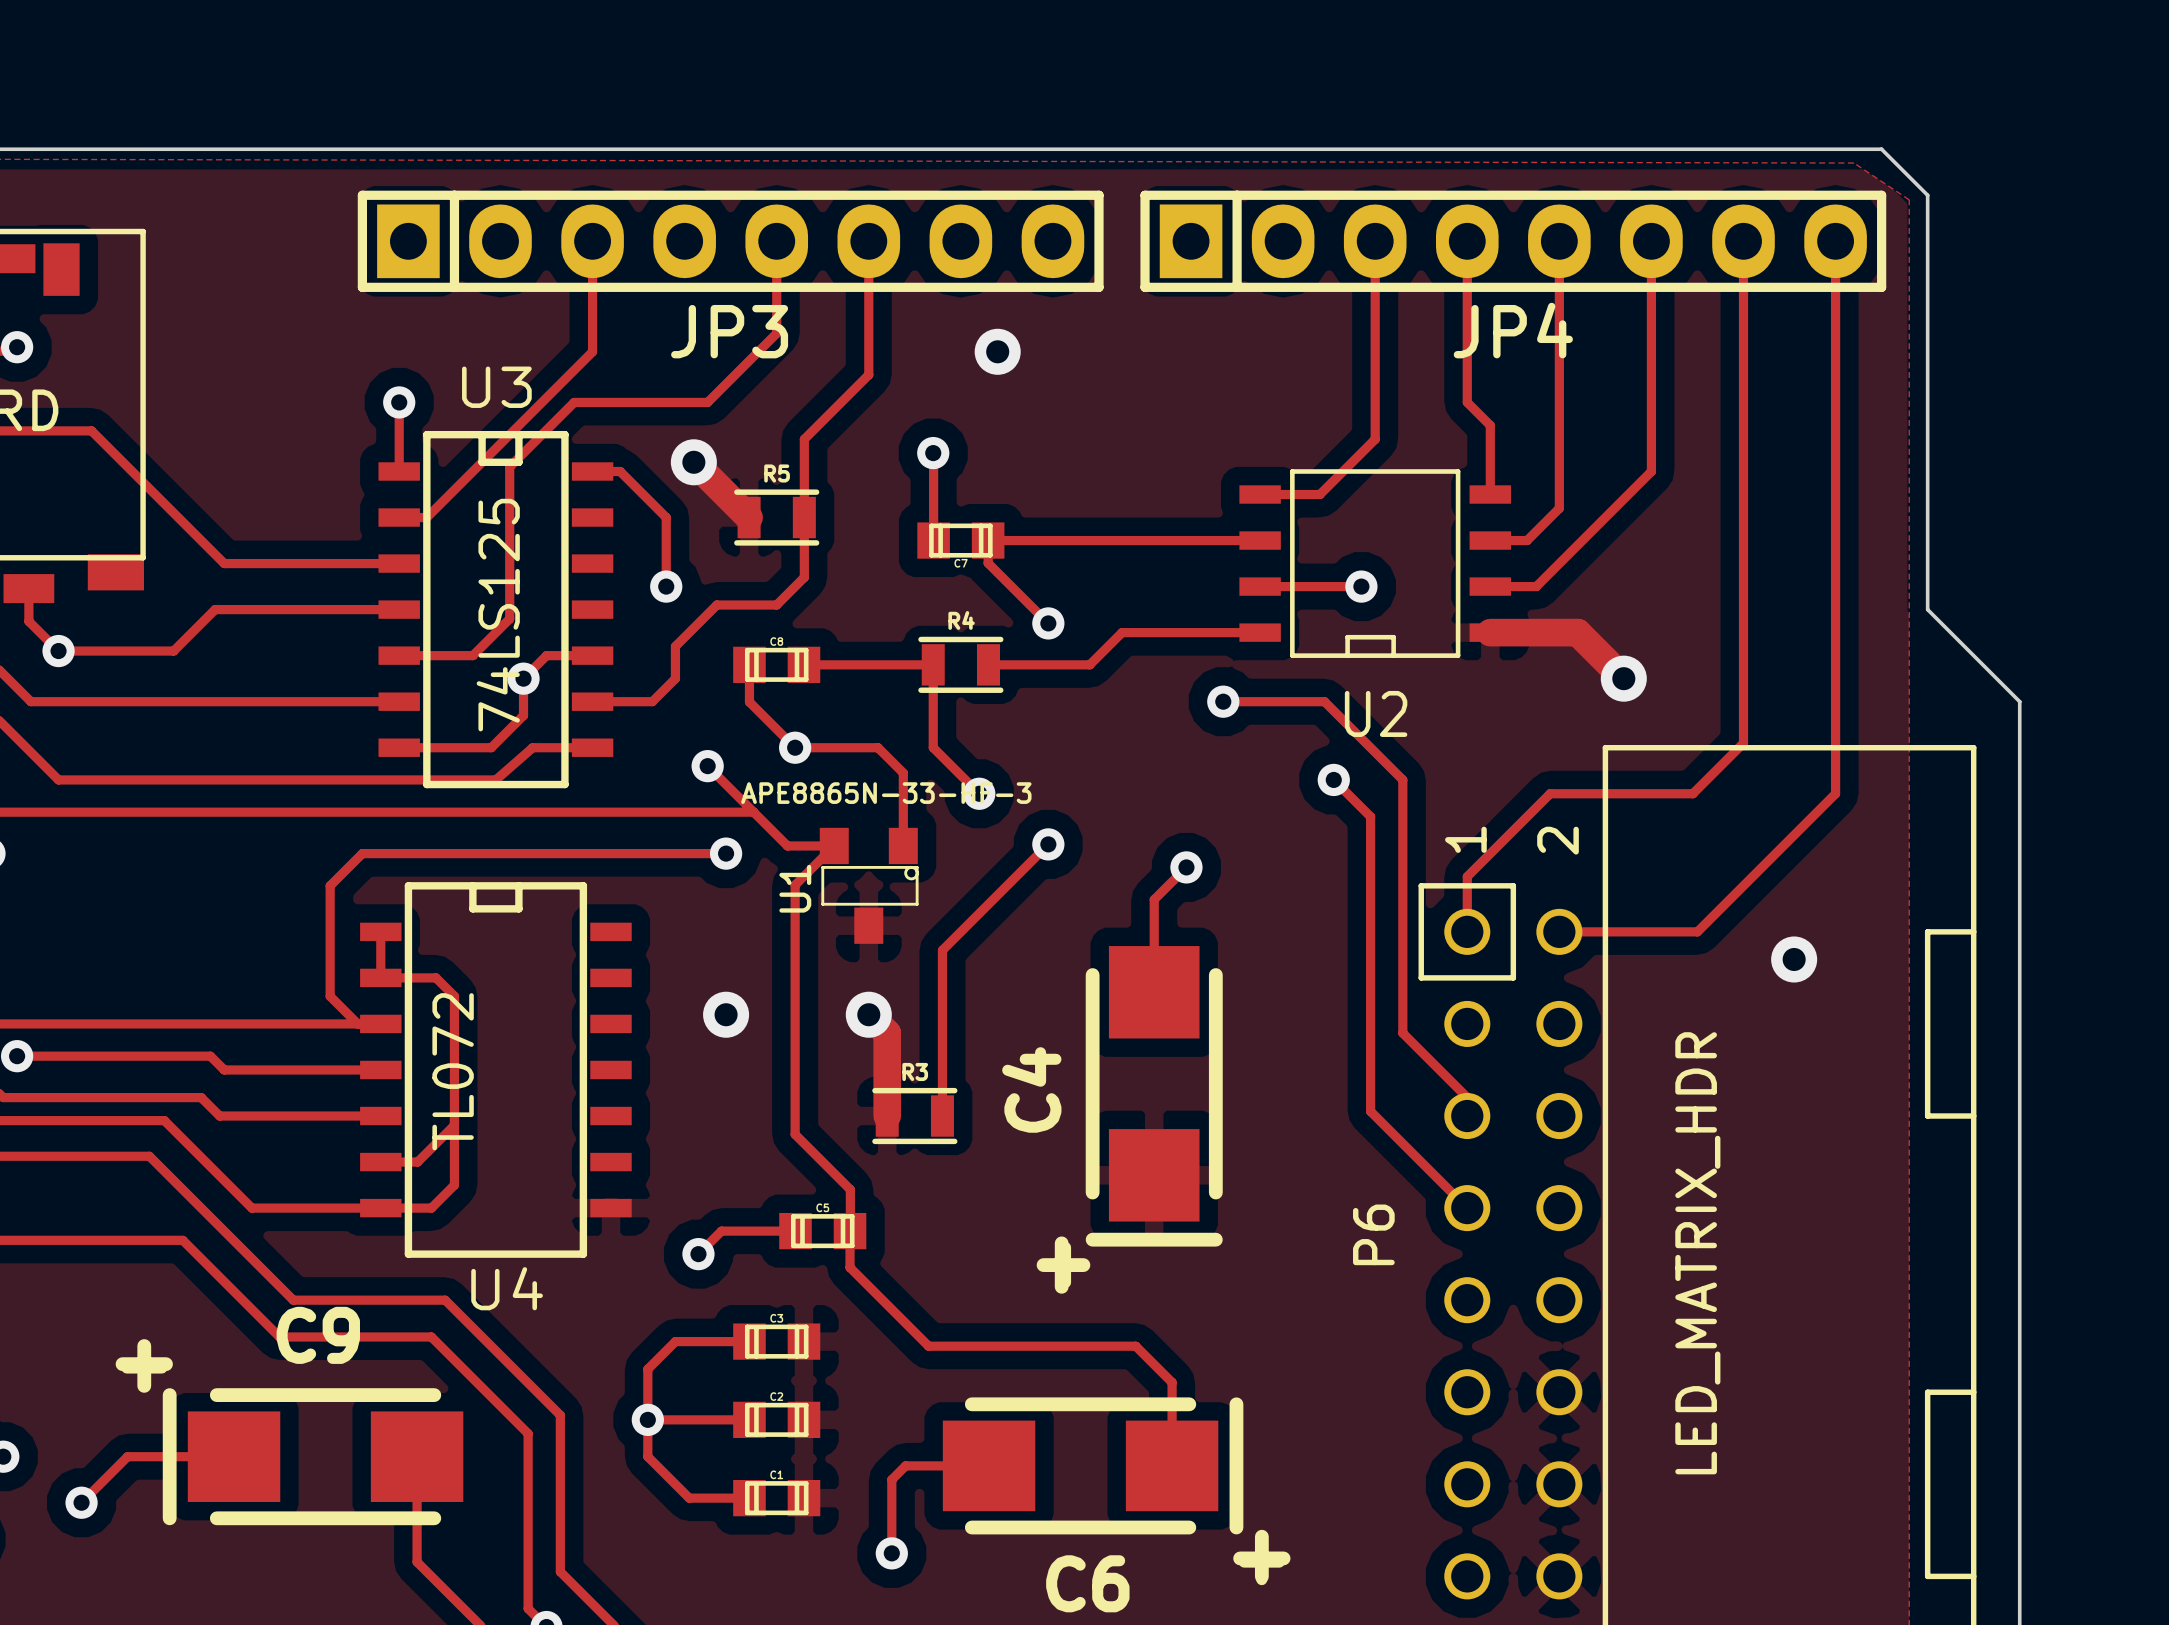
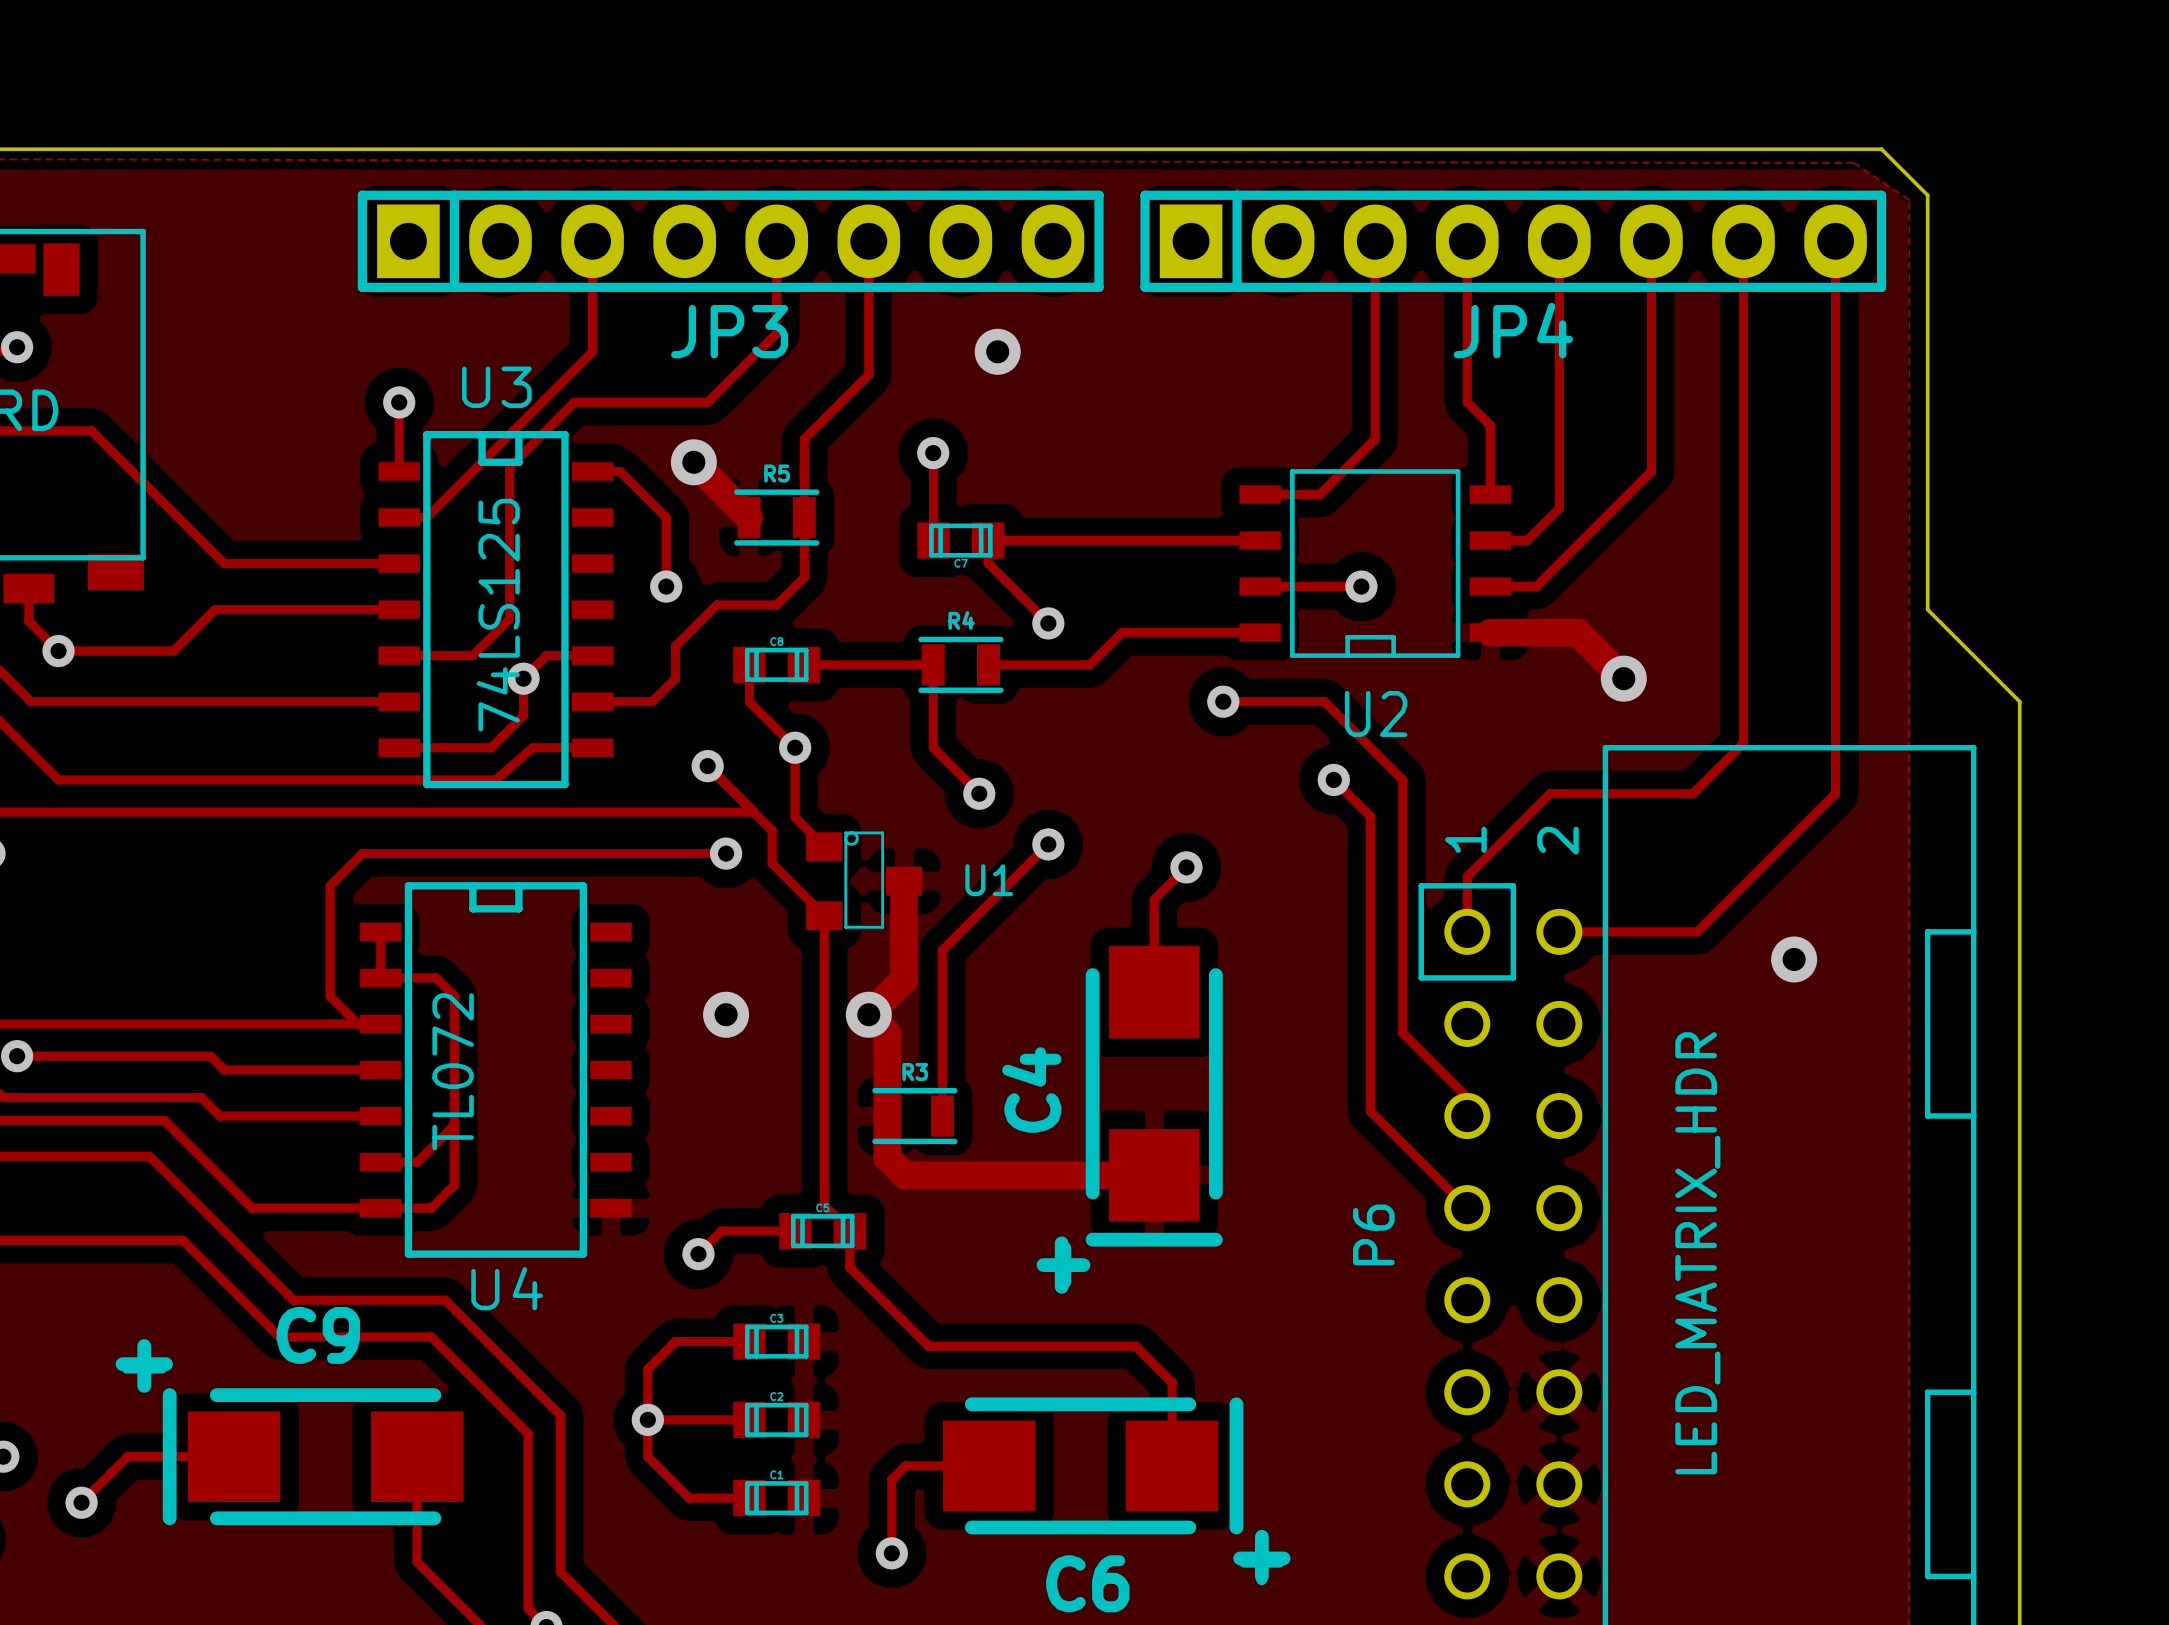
track: (795, 747) (878, 747) (903, 773) (903, 845) -> (795, 747) (795, 817) (824, 846)
U1 value: APE8865N-33-HF-3 (886, 793) -> none
track: (772, 830) (787, 845) (834, 845) (795, 885) (795, 1134) (850, 1189) (850, 1230) -> (772, 830) (772, 863) (824, 915) (824, 1205) (850, 1231)
track: none -> (904, 881) (904, 979) (868, 1014)
U1 rotation: 0° (869, 885) -> 90° counterclockwise (864, 880)
U1 name position: U1 (795, 888) -> U1 (989, 880)
track: none -> (887, 1116) (887, 1157) (905, 1175) (1154, 1175)

